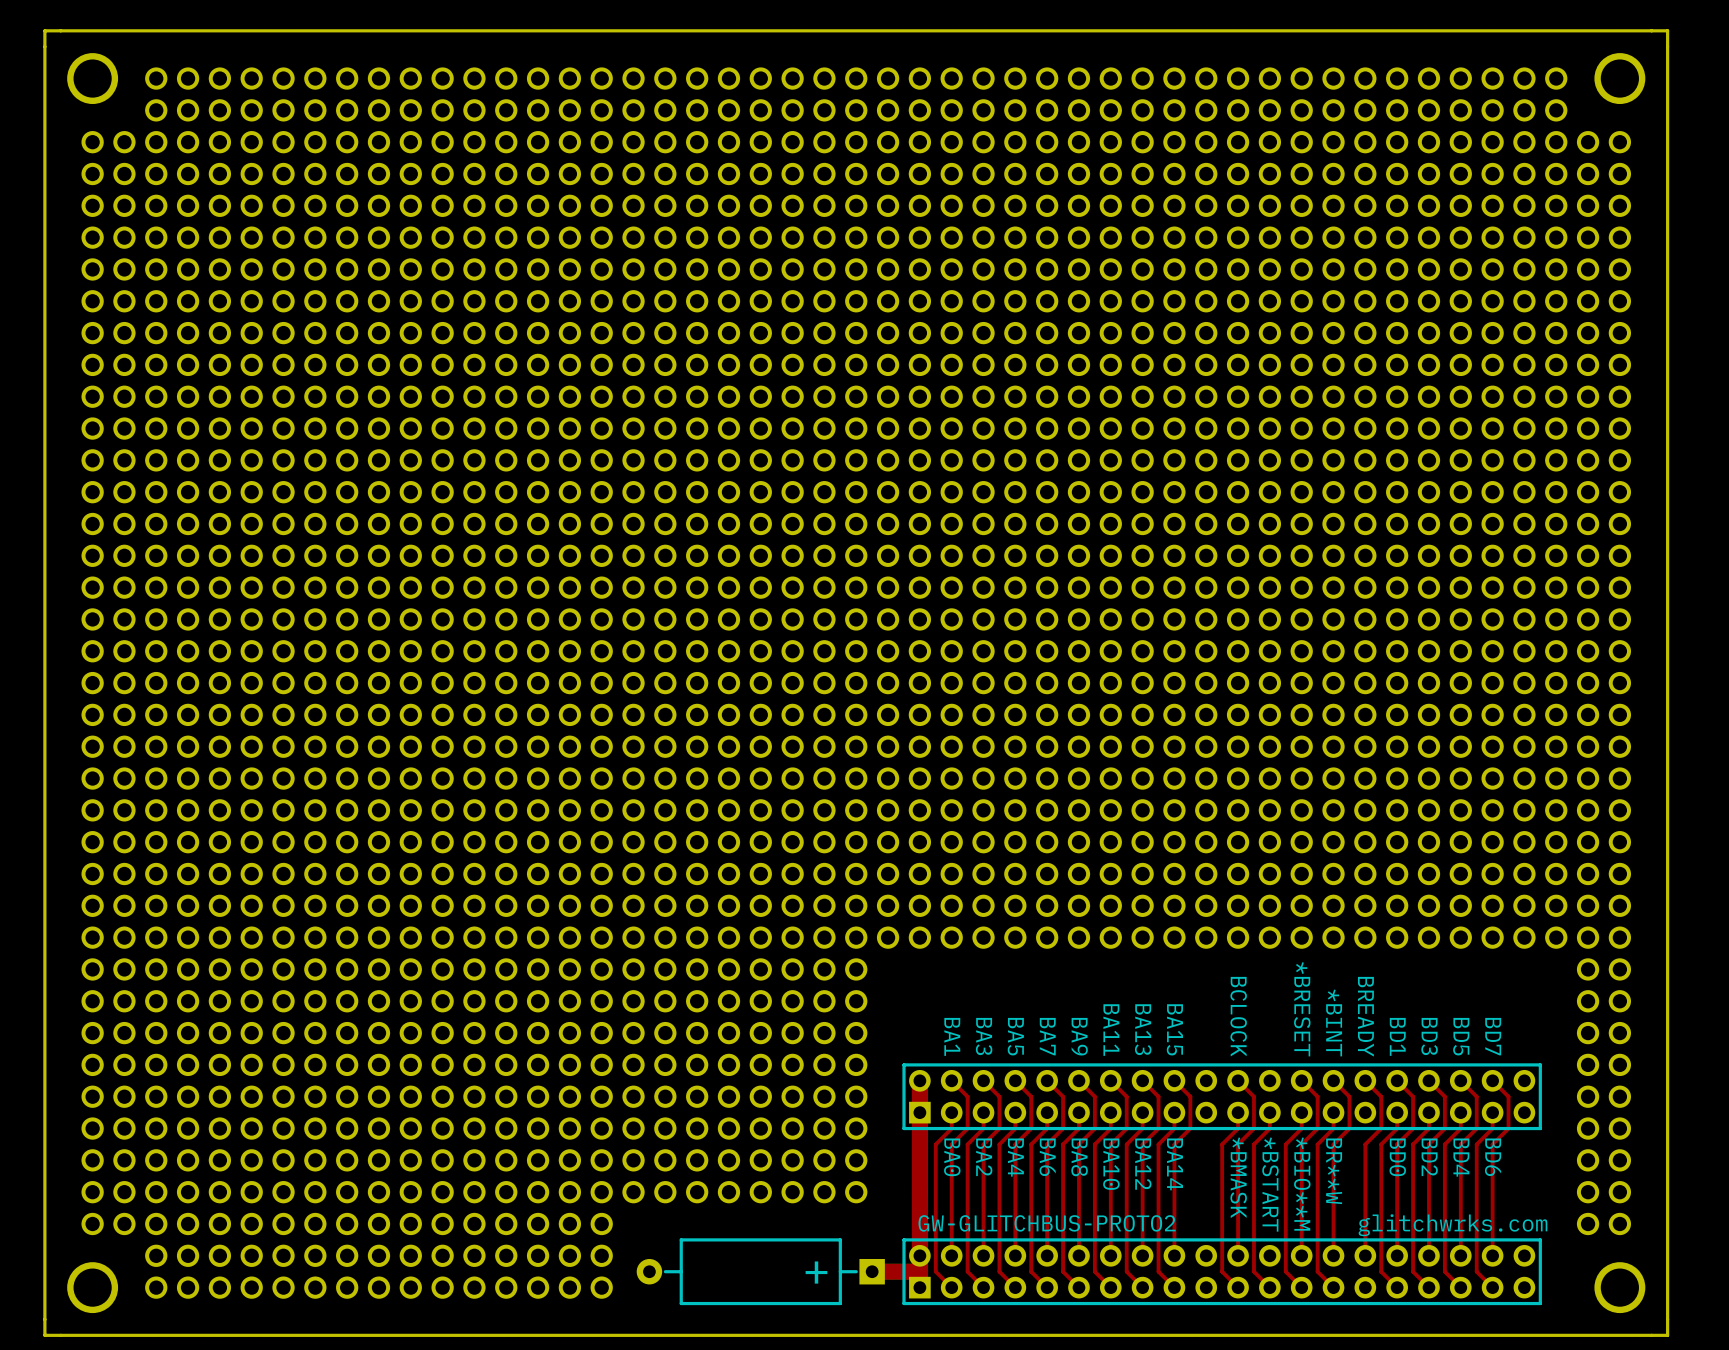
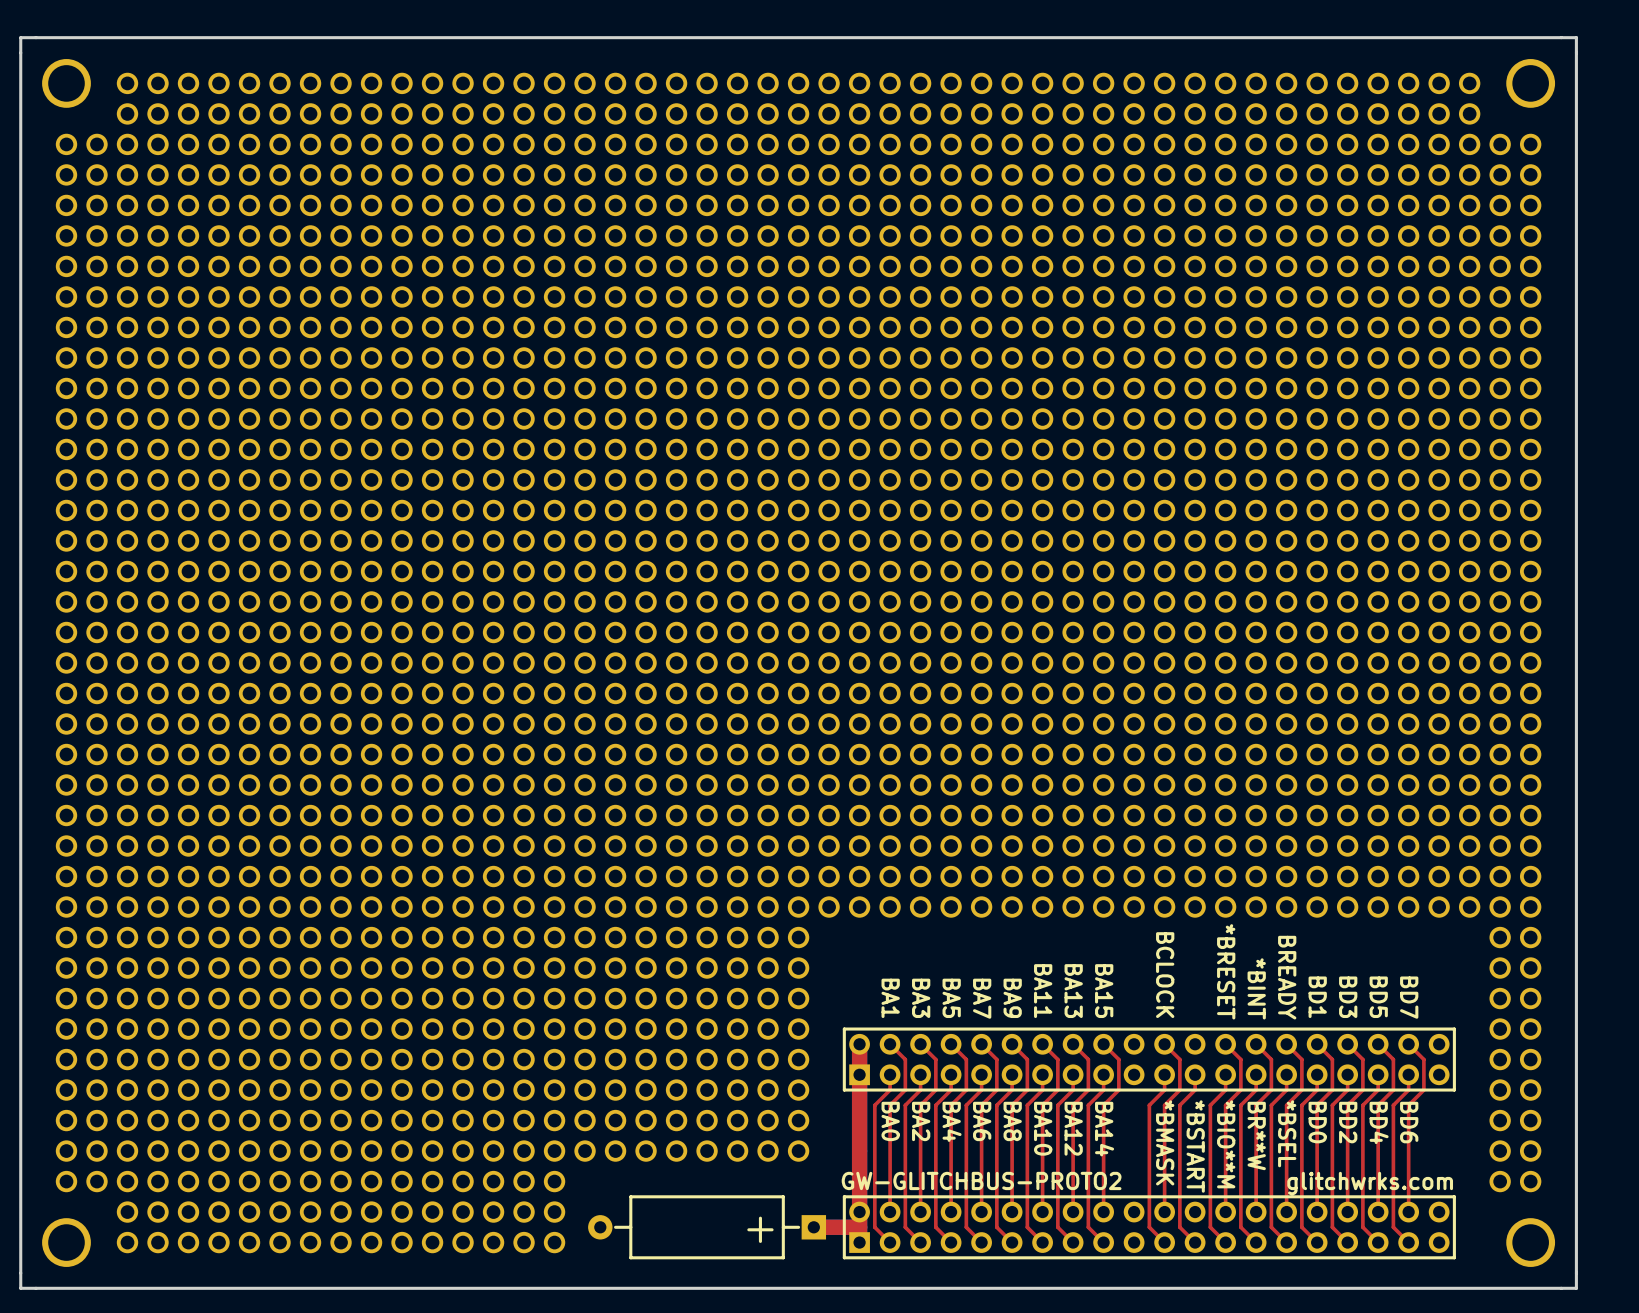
top track: none -> (1286, 1074) (1286, 1090) (1271, 1105) (1271, 1227) (1286, 1242)
text: none -> *BSEL (1287, 1133)

